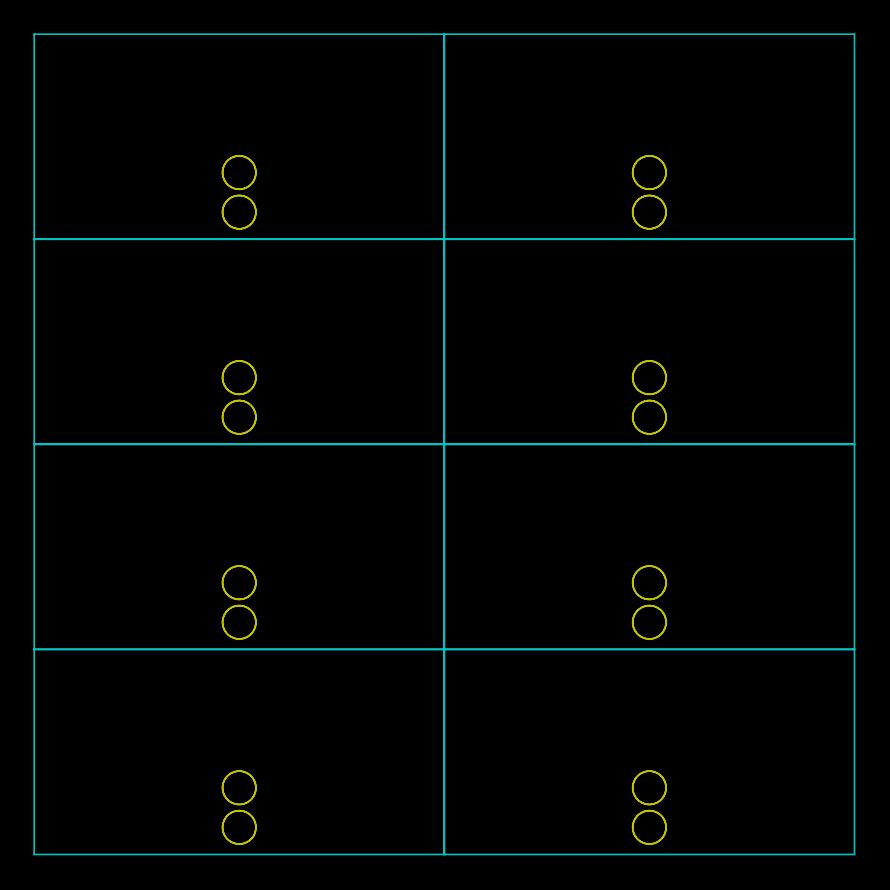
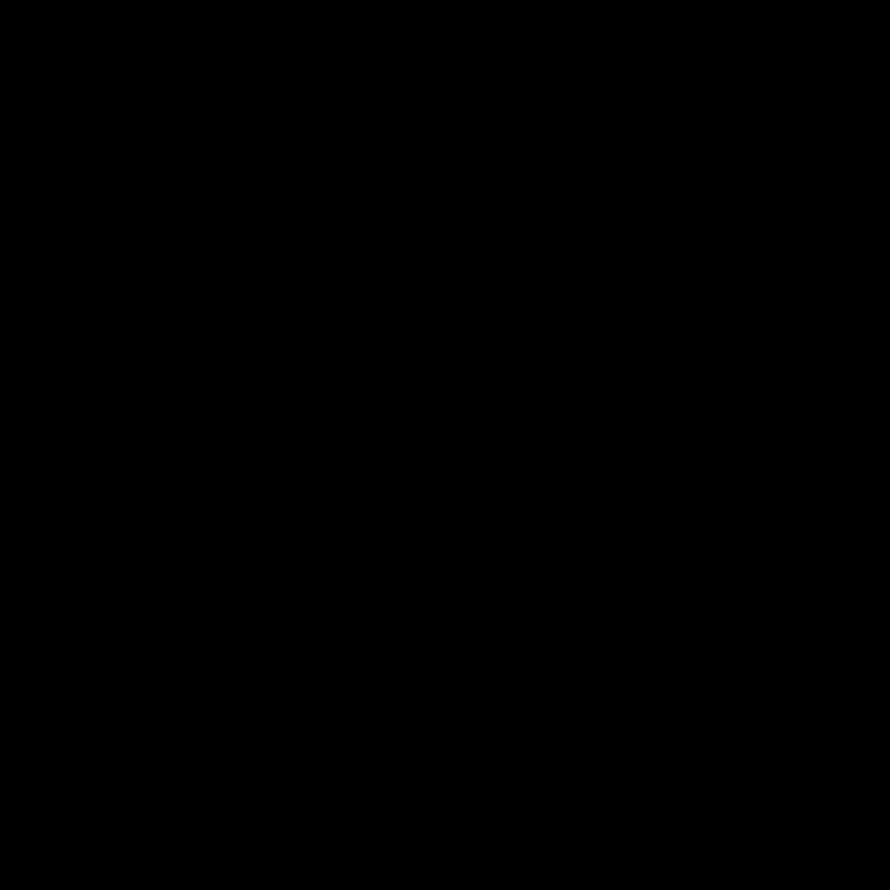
line: (34, 34) (34, 854) (854, 854) (854, 34) (34, 34) -> none
line: (444, 34) (444, 854) -> none
round board edge: [221, 155, 257, 191] -> none
round board edge: [631, 155, 667, 191] -> none
round board edge: [221, 194, 257, 230] -> none
round board edge: [631, 194, 667, 230] -> none
line: (34, 239) (854, 239) -> none
round board edge: [221, 360, 257, 396] -> none
round board edge: [631, 360, 667, 396] -> none
round board edge: [221, 399, 257, 435] -> none
round board edge: [631, 399, 667, 435] -> none
line: (34, 444) (854, 444) -> none
round board edge: [221, 565, 257, 601] -> none
round board edge: [631, 565, 667, 601] -> none
round board edge: [221, 604, 257, 640] -> none
round board edge: [631, 604, 667, 640] -> none
line: (34, 649) (854, 649) -> none
round board edge: [221, 770, 257, 806] -> none
round board edge: [631, 770, 667, 806] -> none
round board edge: [221, 809, 257, 845] -> none
round board edge: [631, 809, 667, 845] -> none

